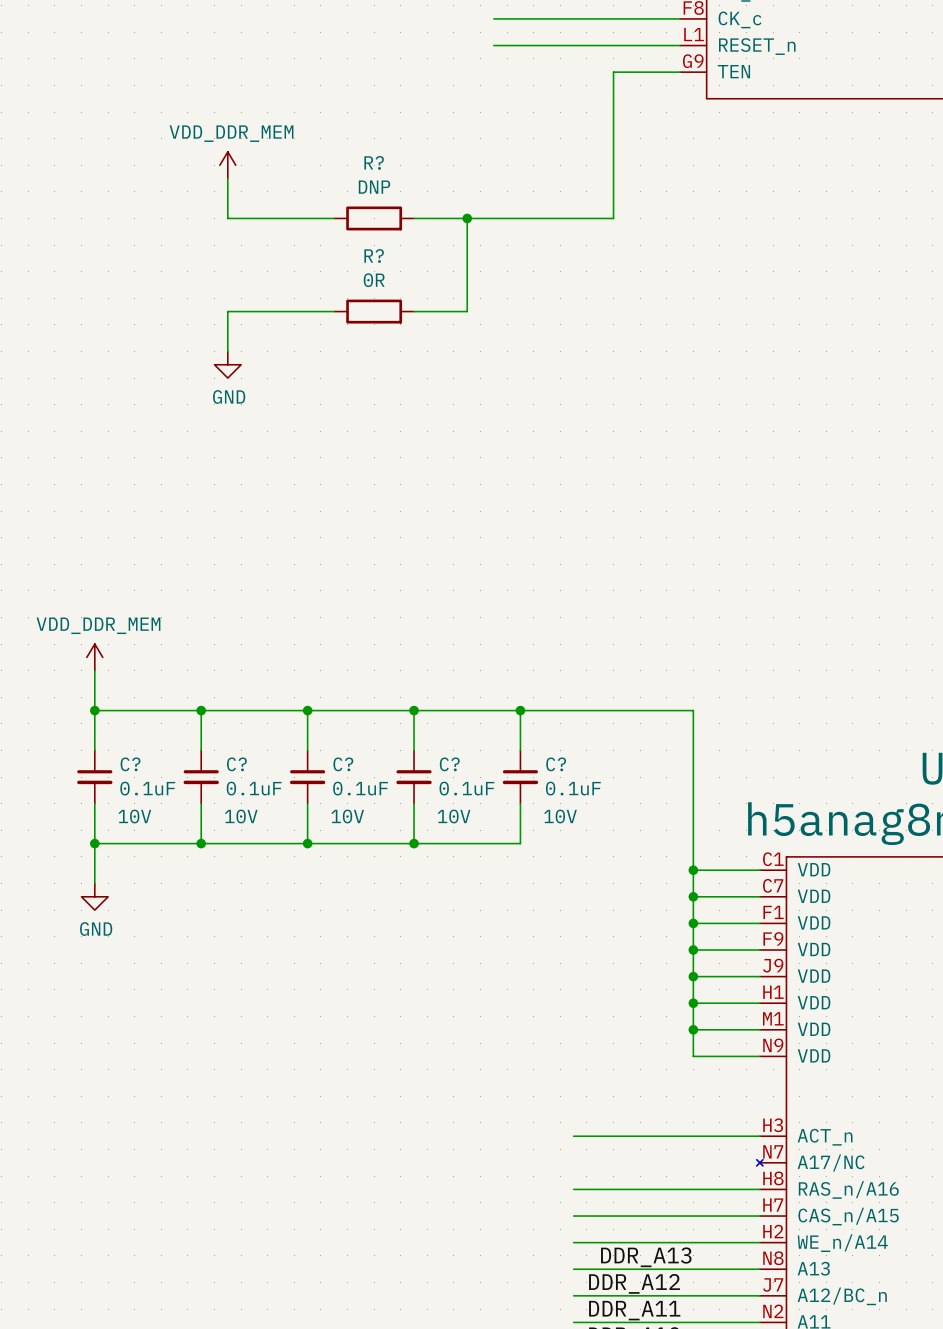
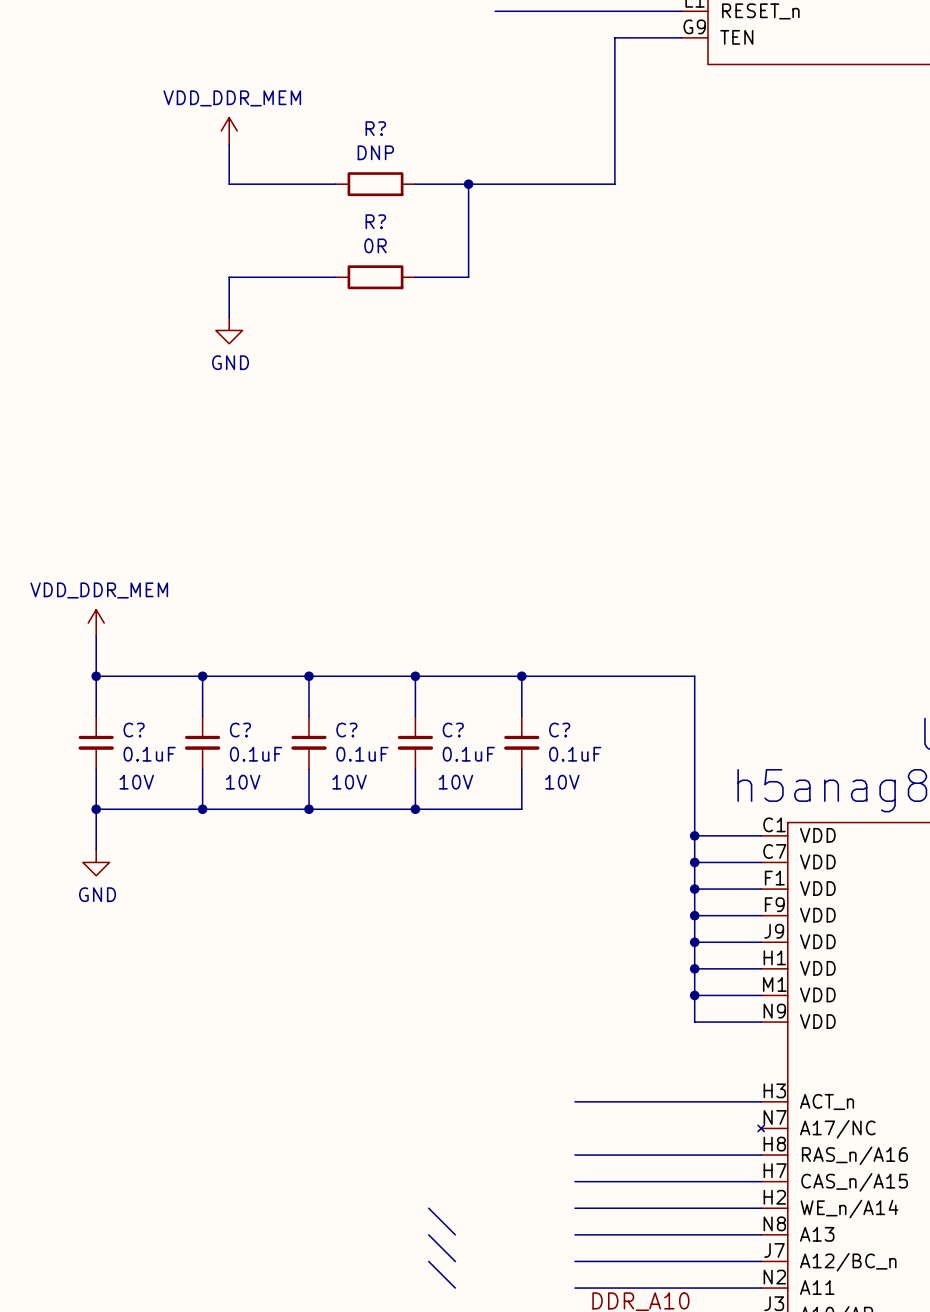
wire: none -> (428, 1208) (455, 1234)
label: DDR_A13 (646, 1257) -> none
wire: none -> (428, 1234) (455, 1261)
label: DDR_A12 (634, 1283) -> none
wire: none -> (428, 1261) (455, 1288)
label: DDR_A11 (634, 1310) -> none

